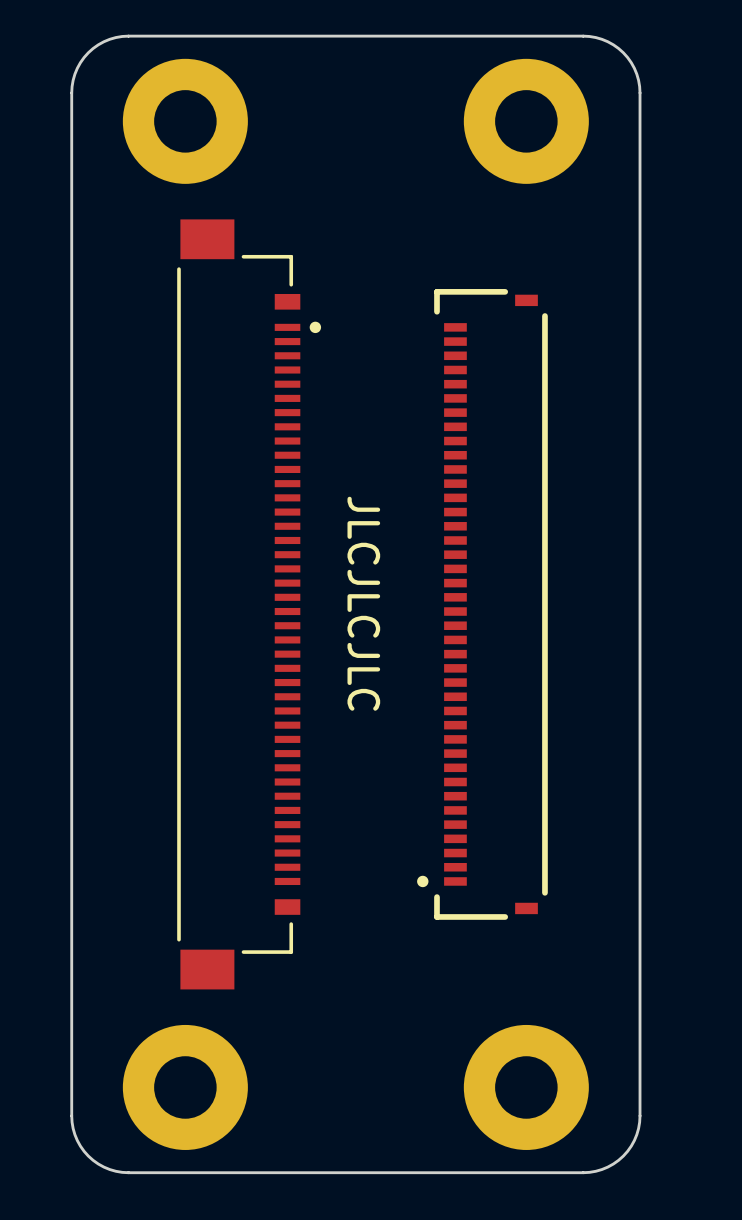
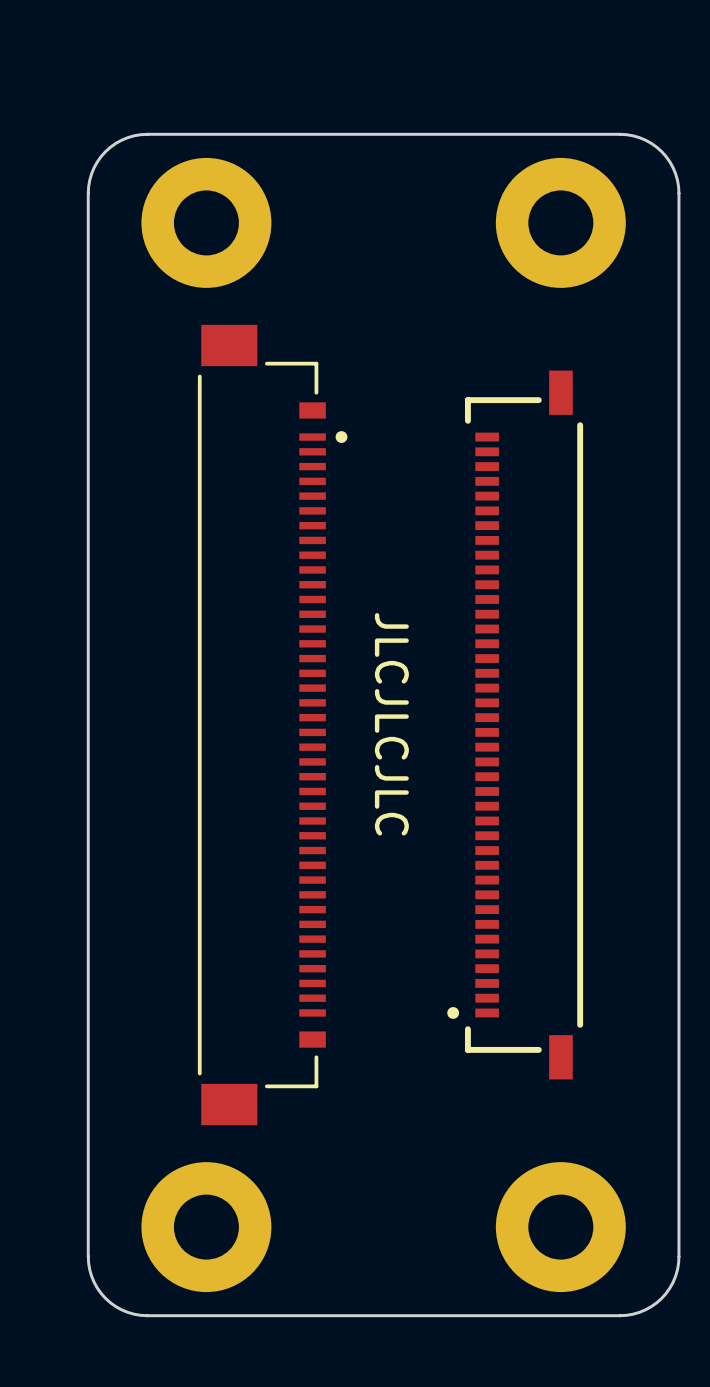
part footprint: [417, 289, 548, 920] -> [447, 370, 584, 1080]

